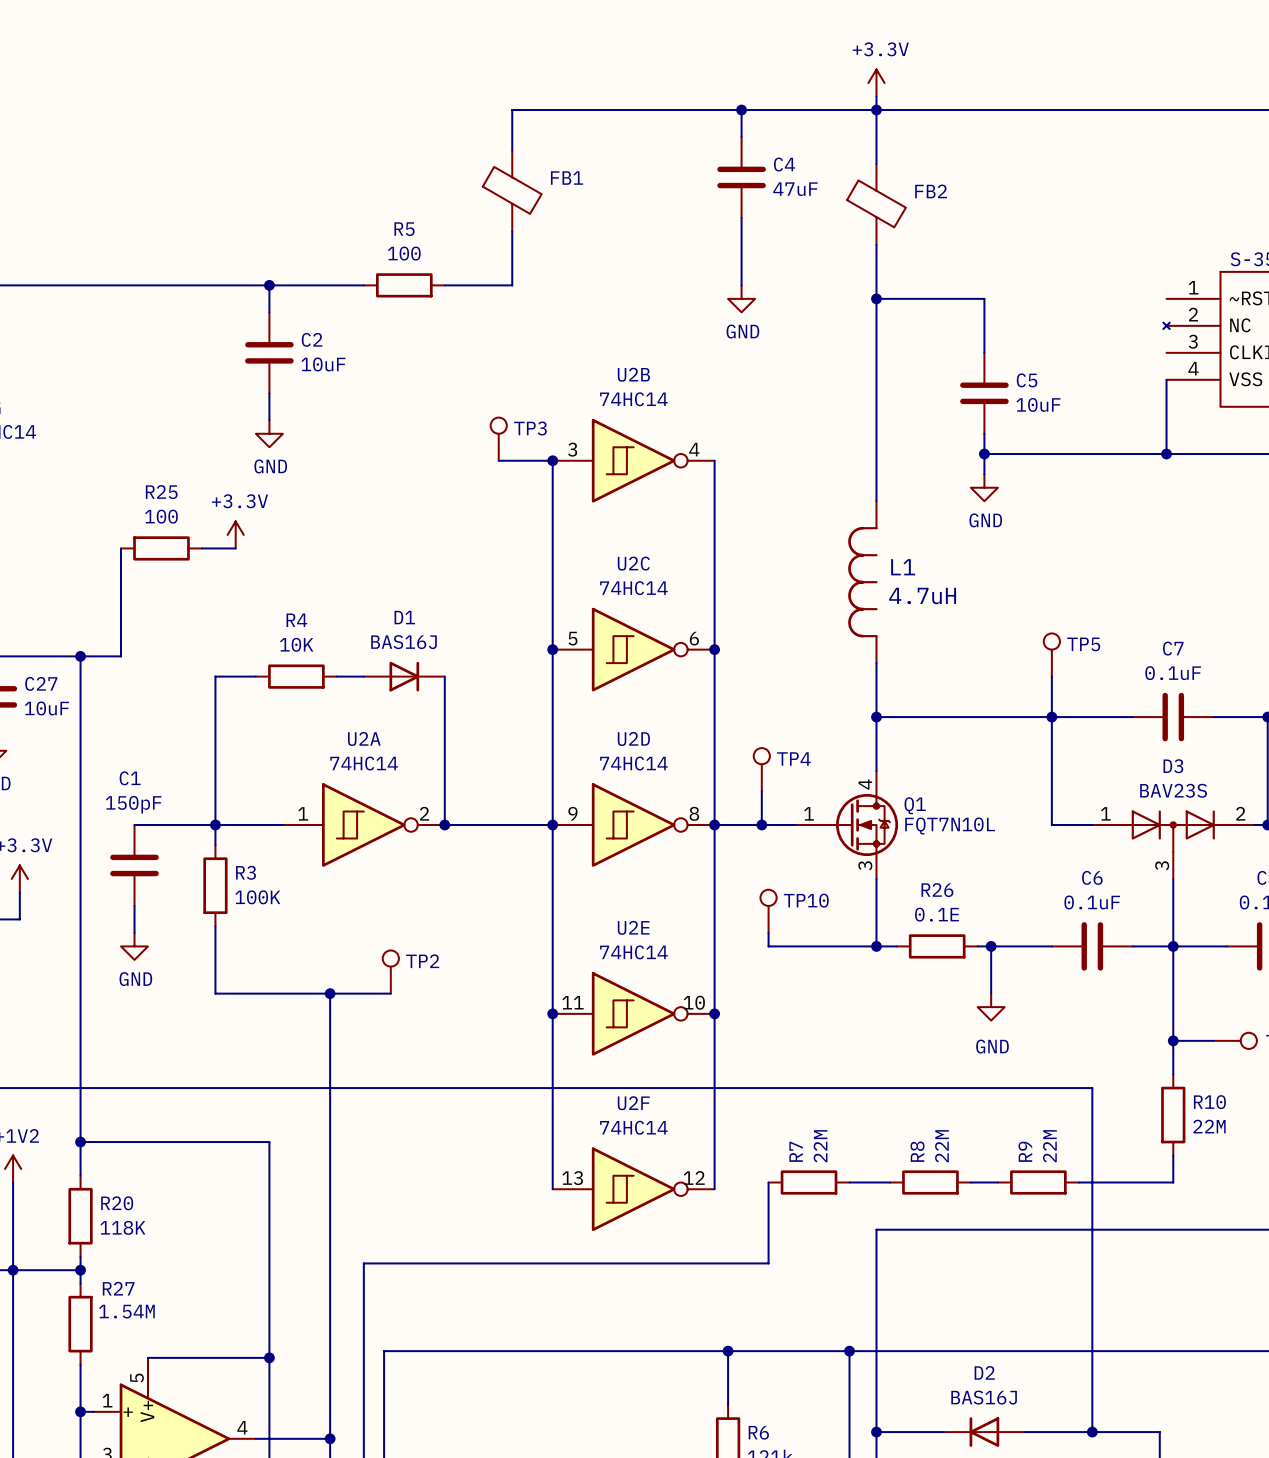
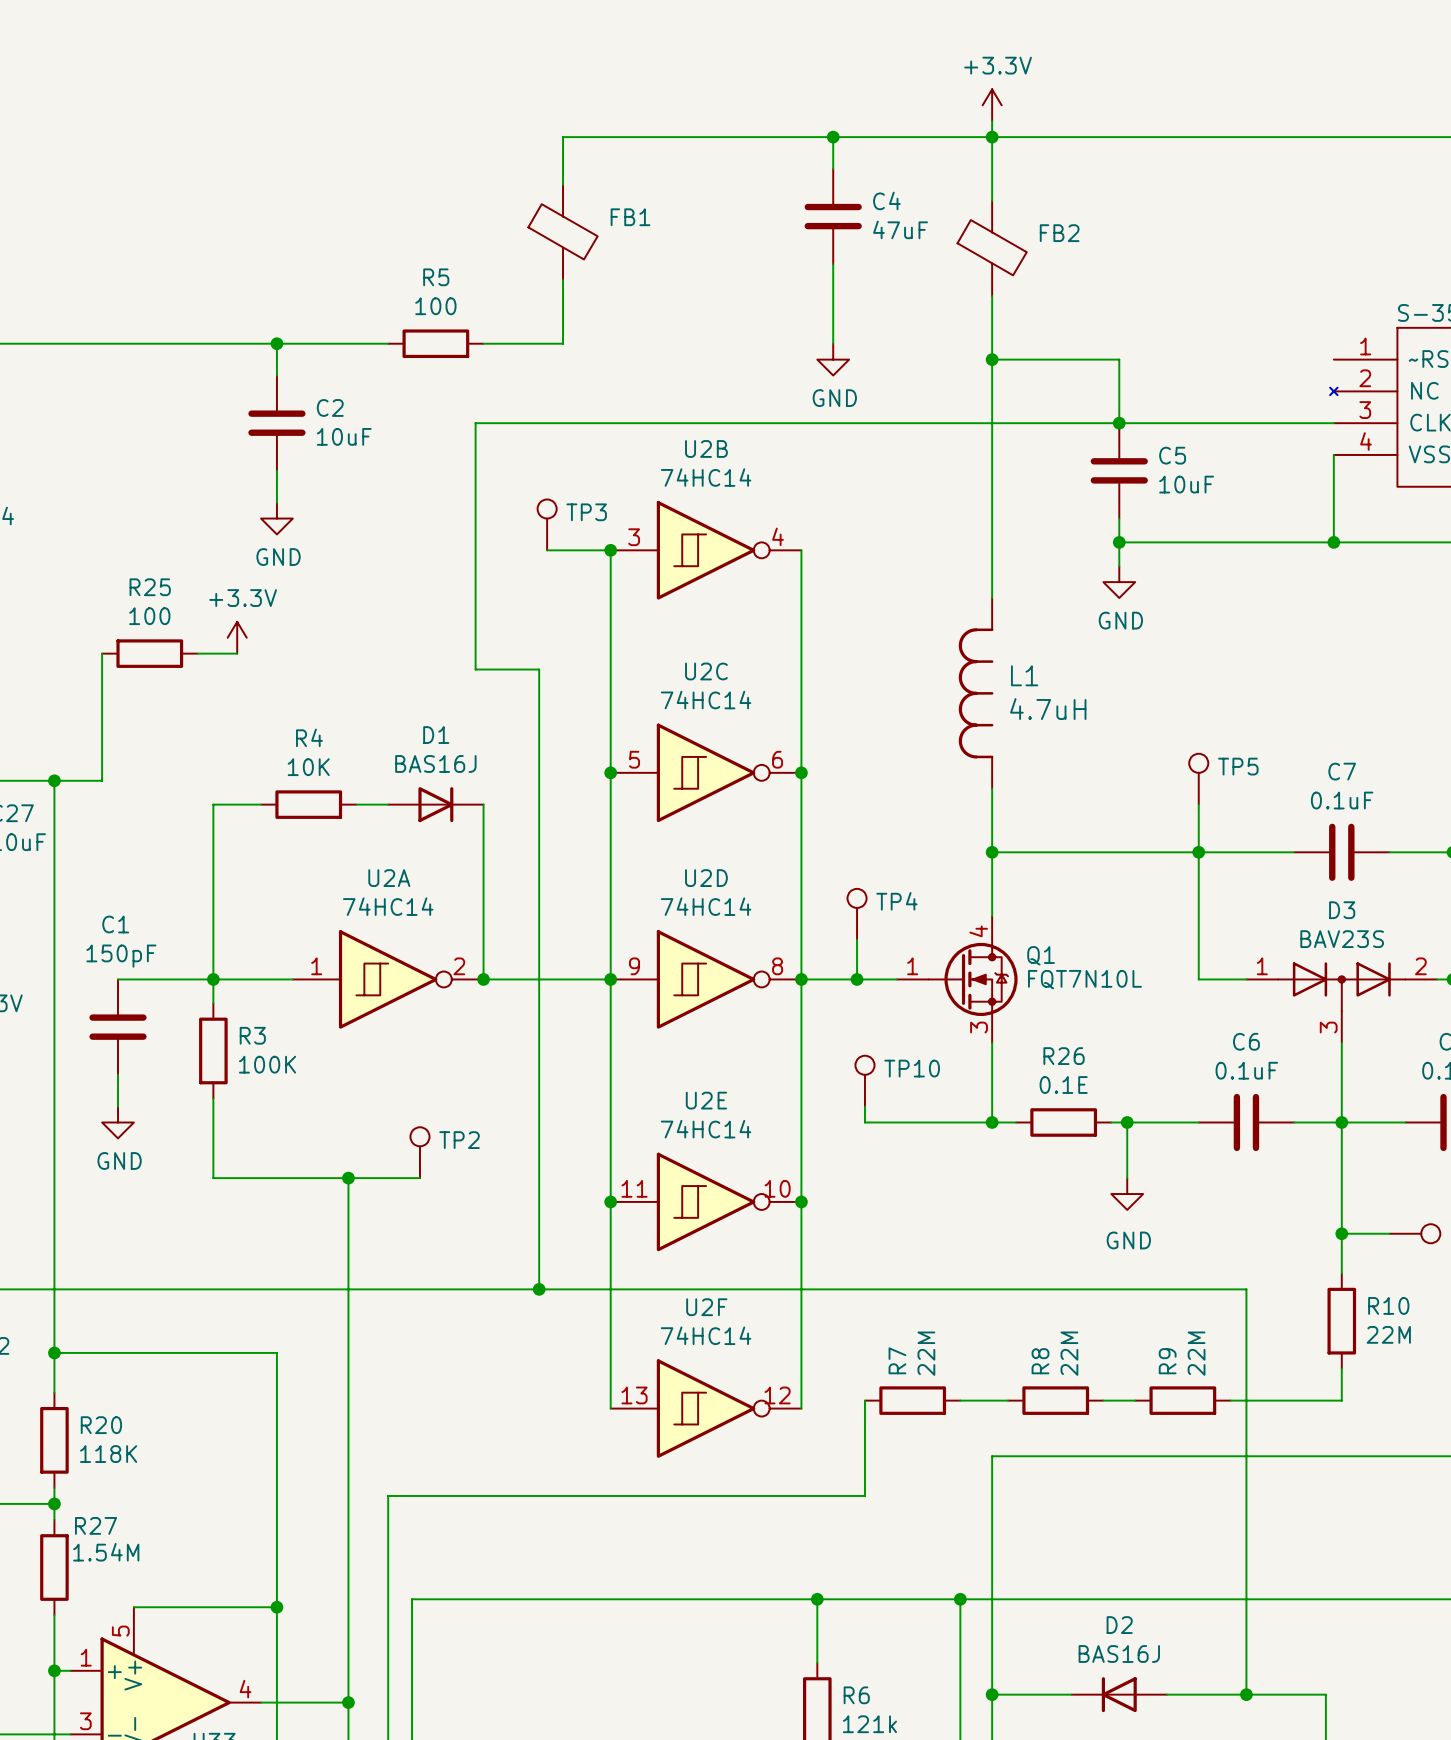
junction: none -> (1119, 423)
wire: none -> (1333, 423) (475, 423) (475, 669) (539, 669) (539, 1289)
junction: none -> (539, 1289)

